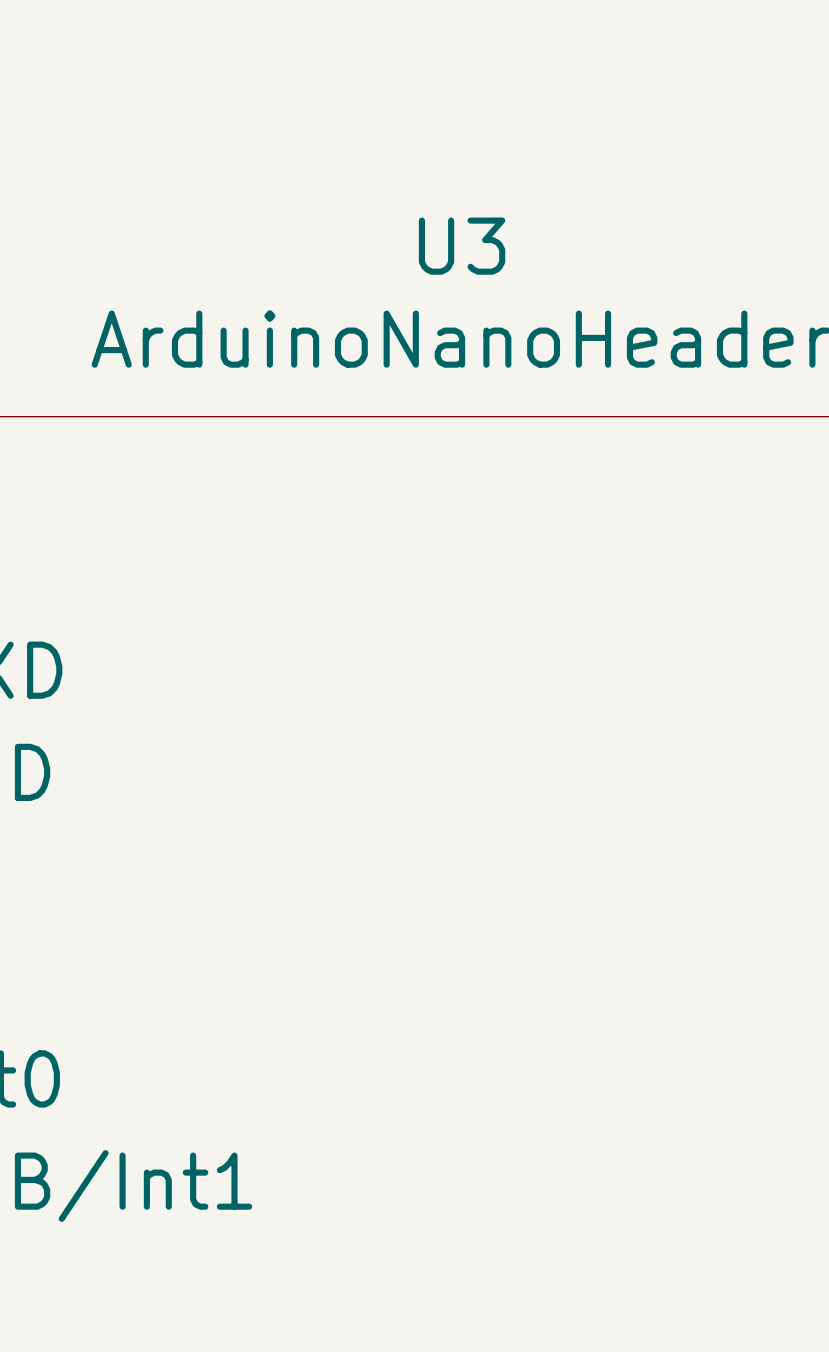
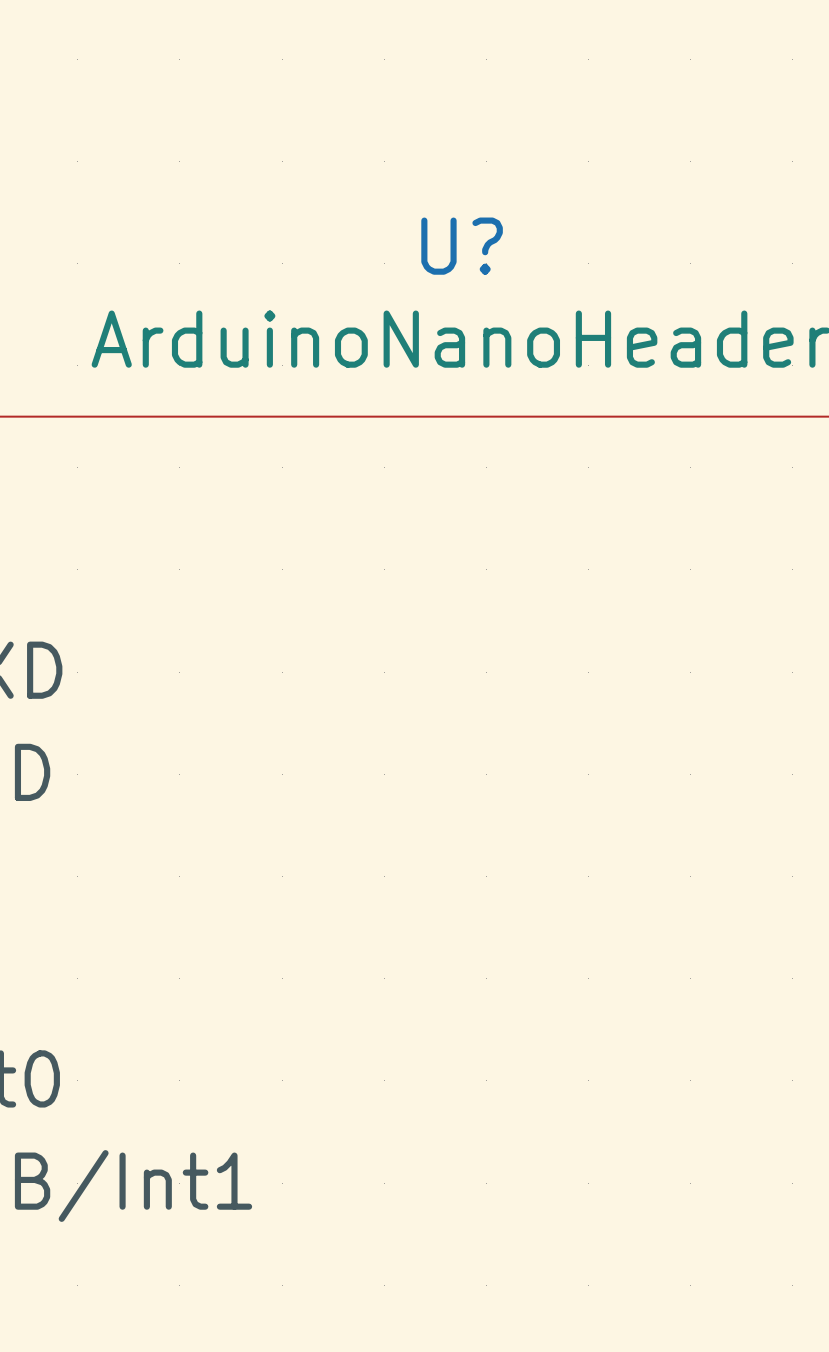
U3 name: U3 (462, 246) -> U? (462, 246)

